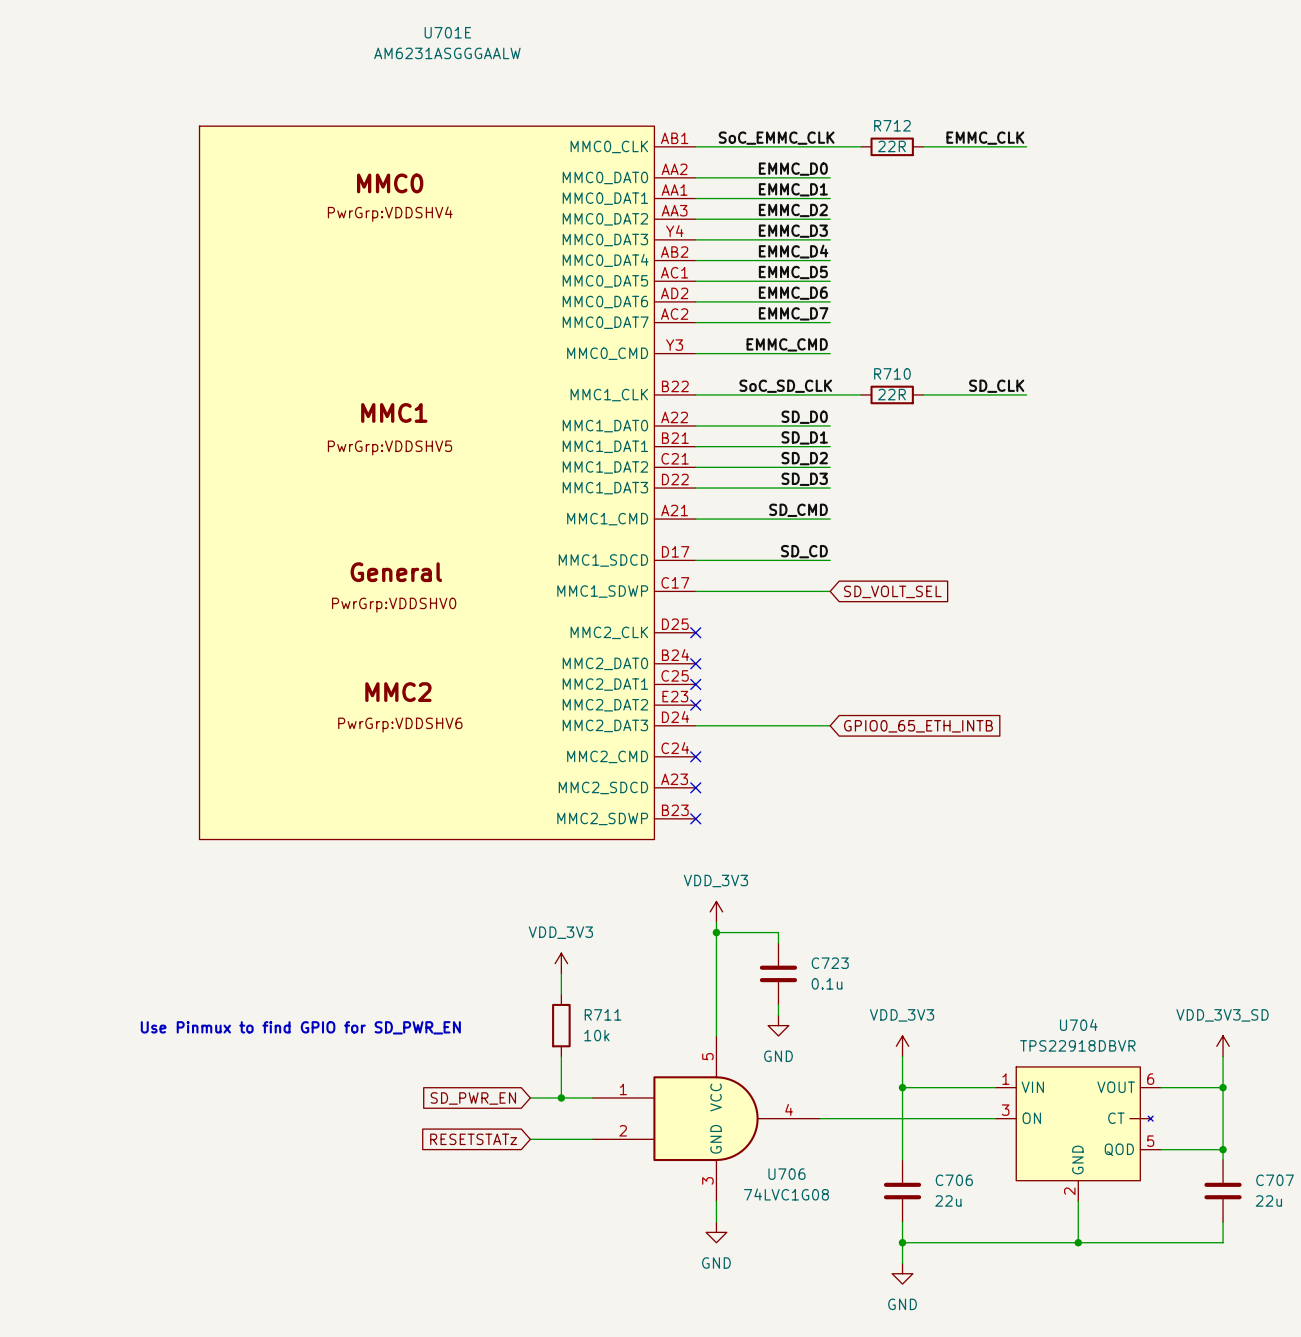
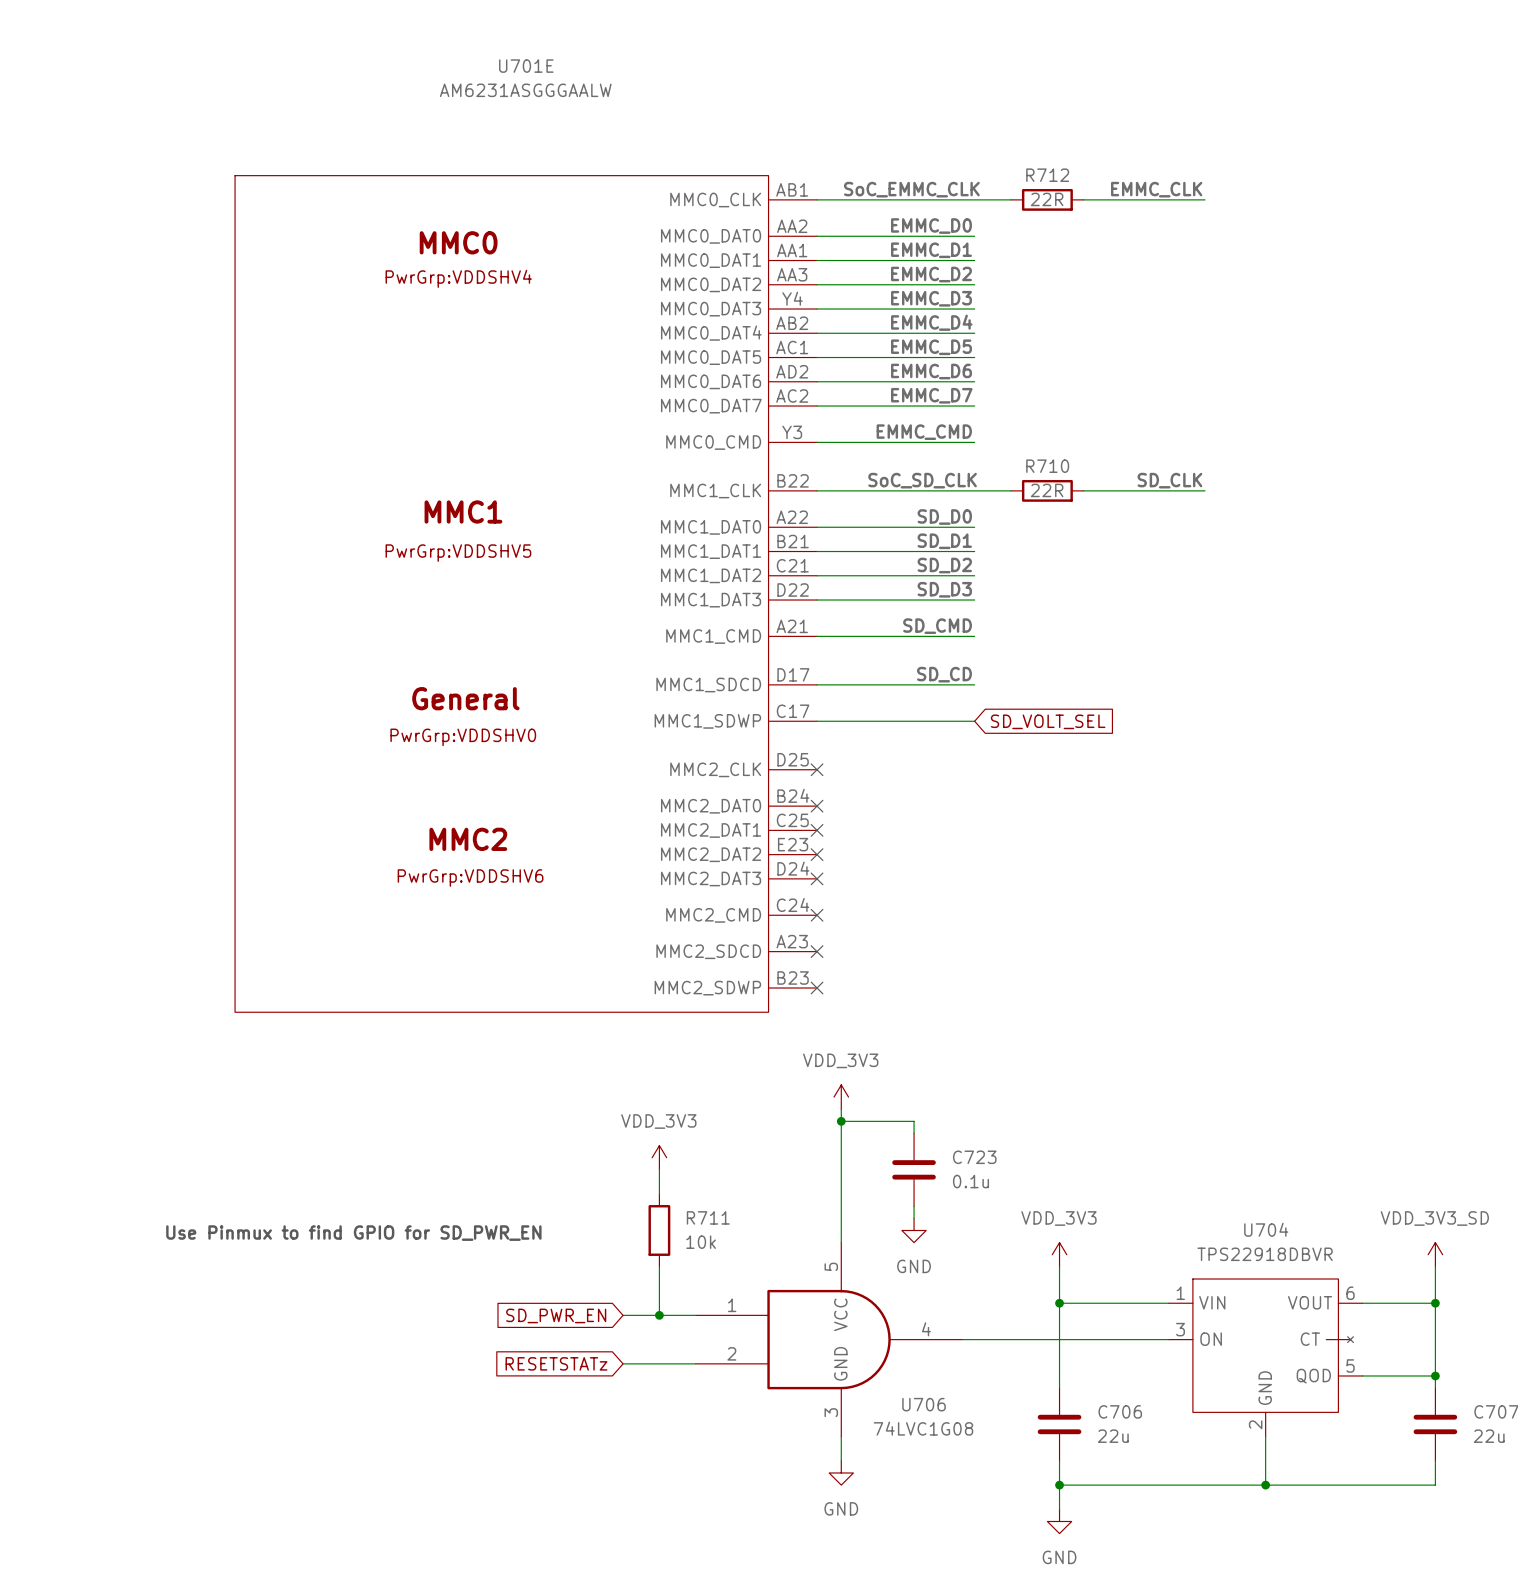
wire: (695, 725) (830, 725) -> none
no-connect mark: none -> (817, 878)
global label: GPIO0_65_ETH_INTB (918, 726) -> none

